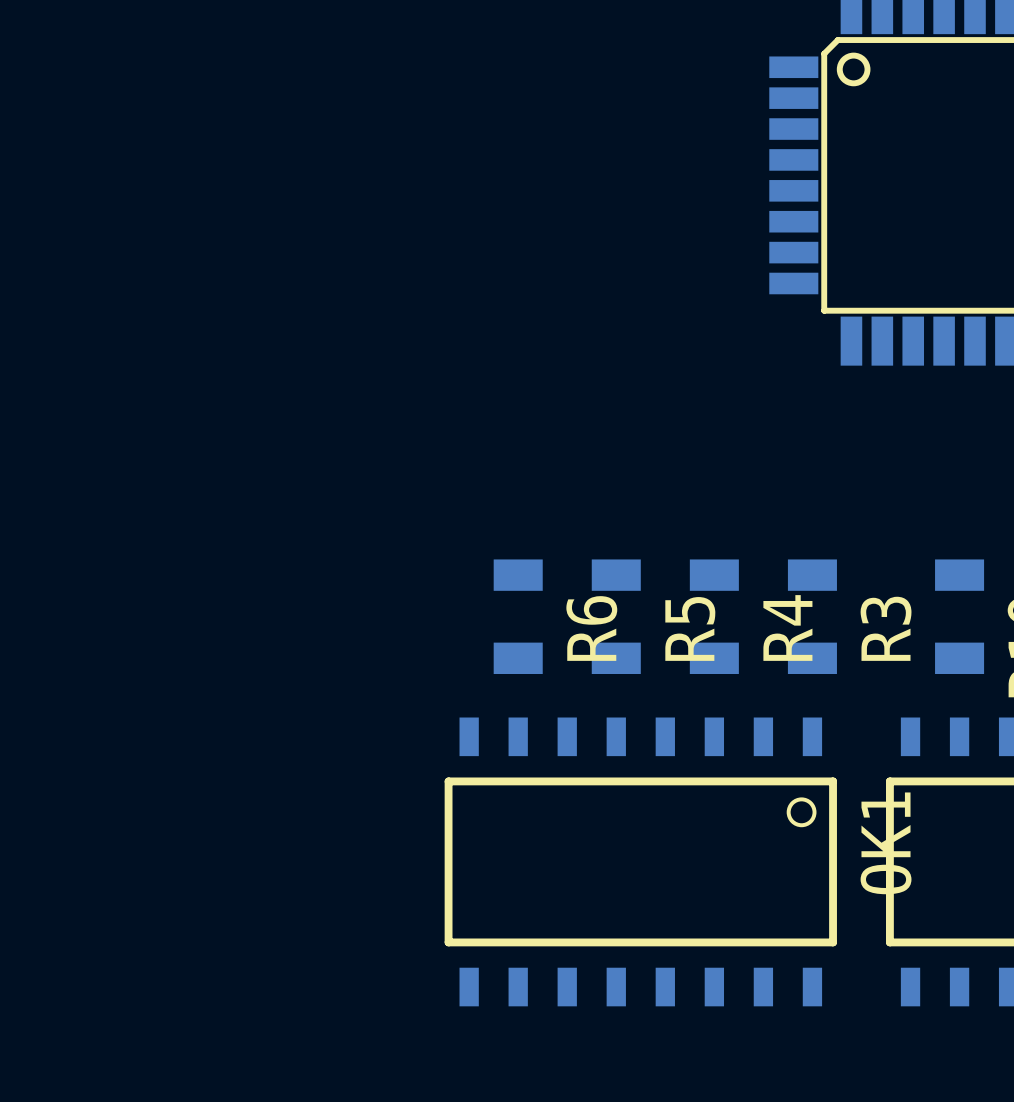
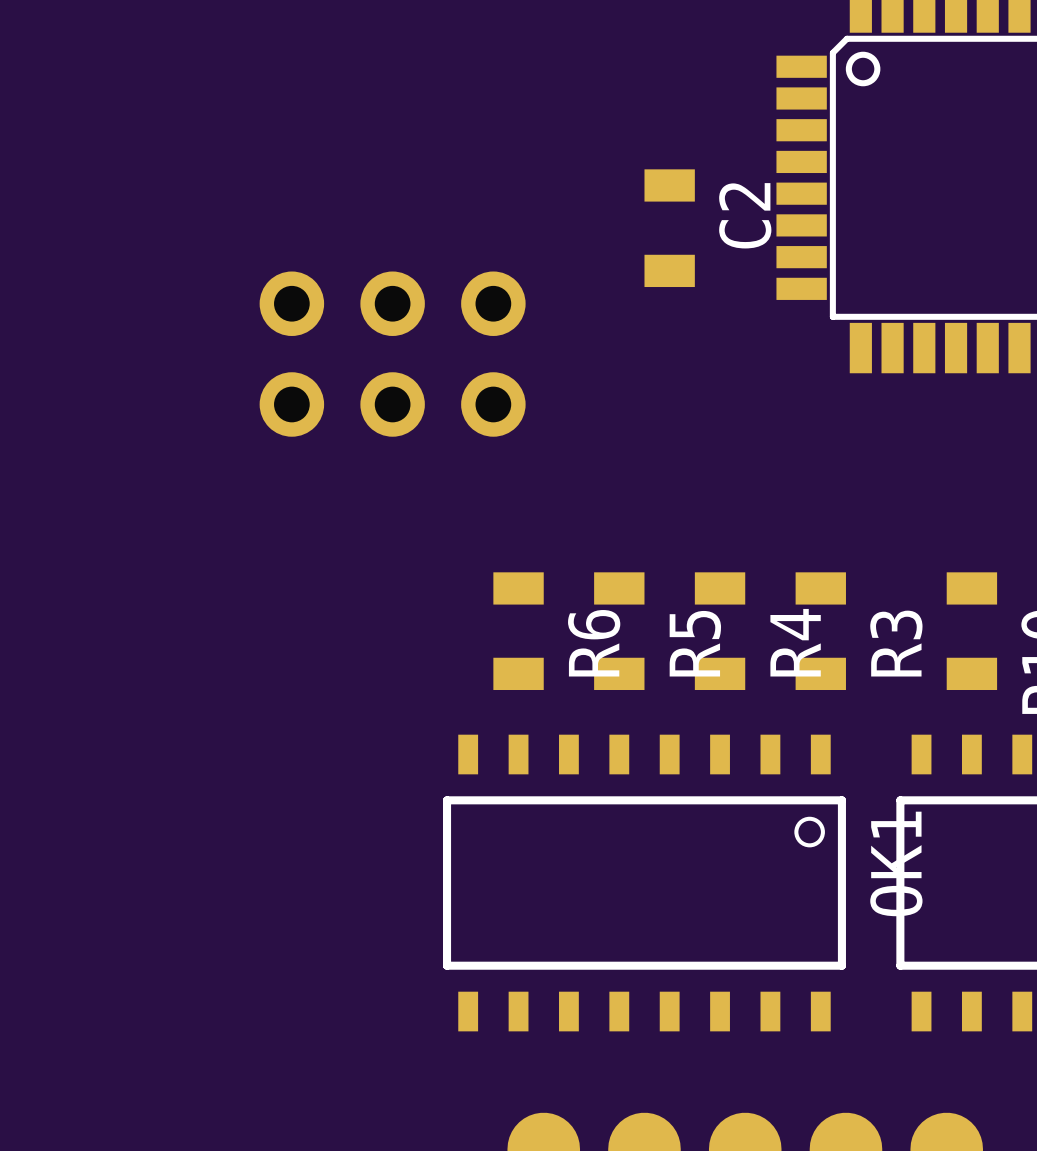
C2: none -> (669, 228)
part: none -> (392, 354)

